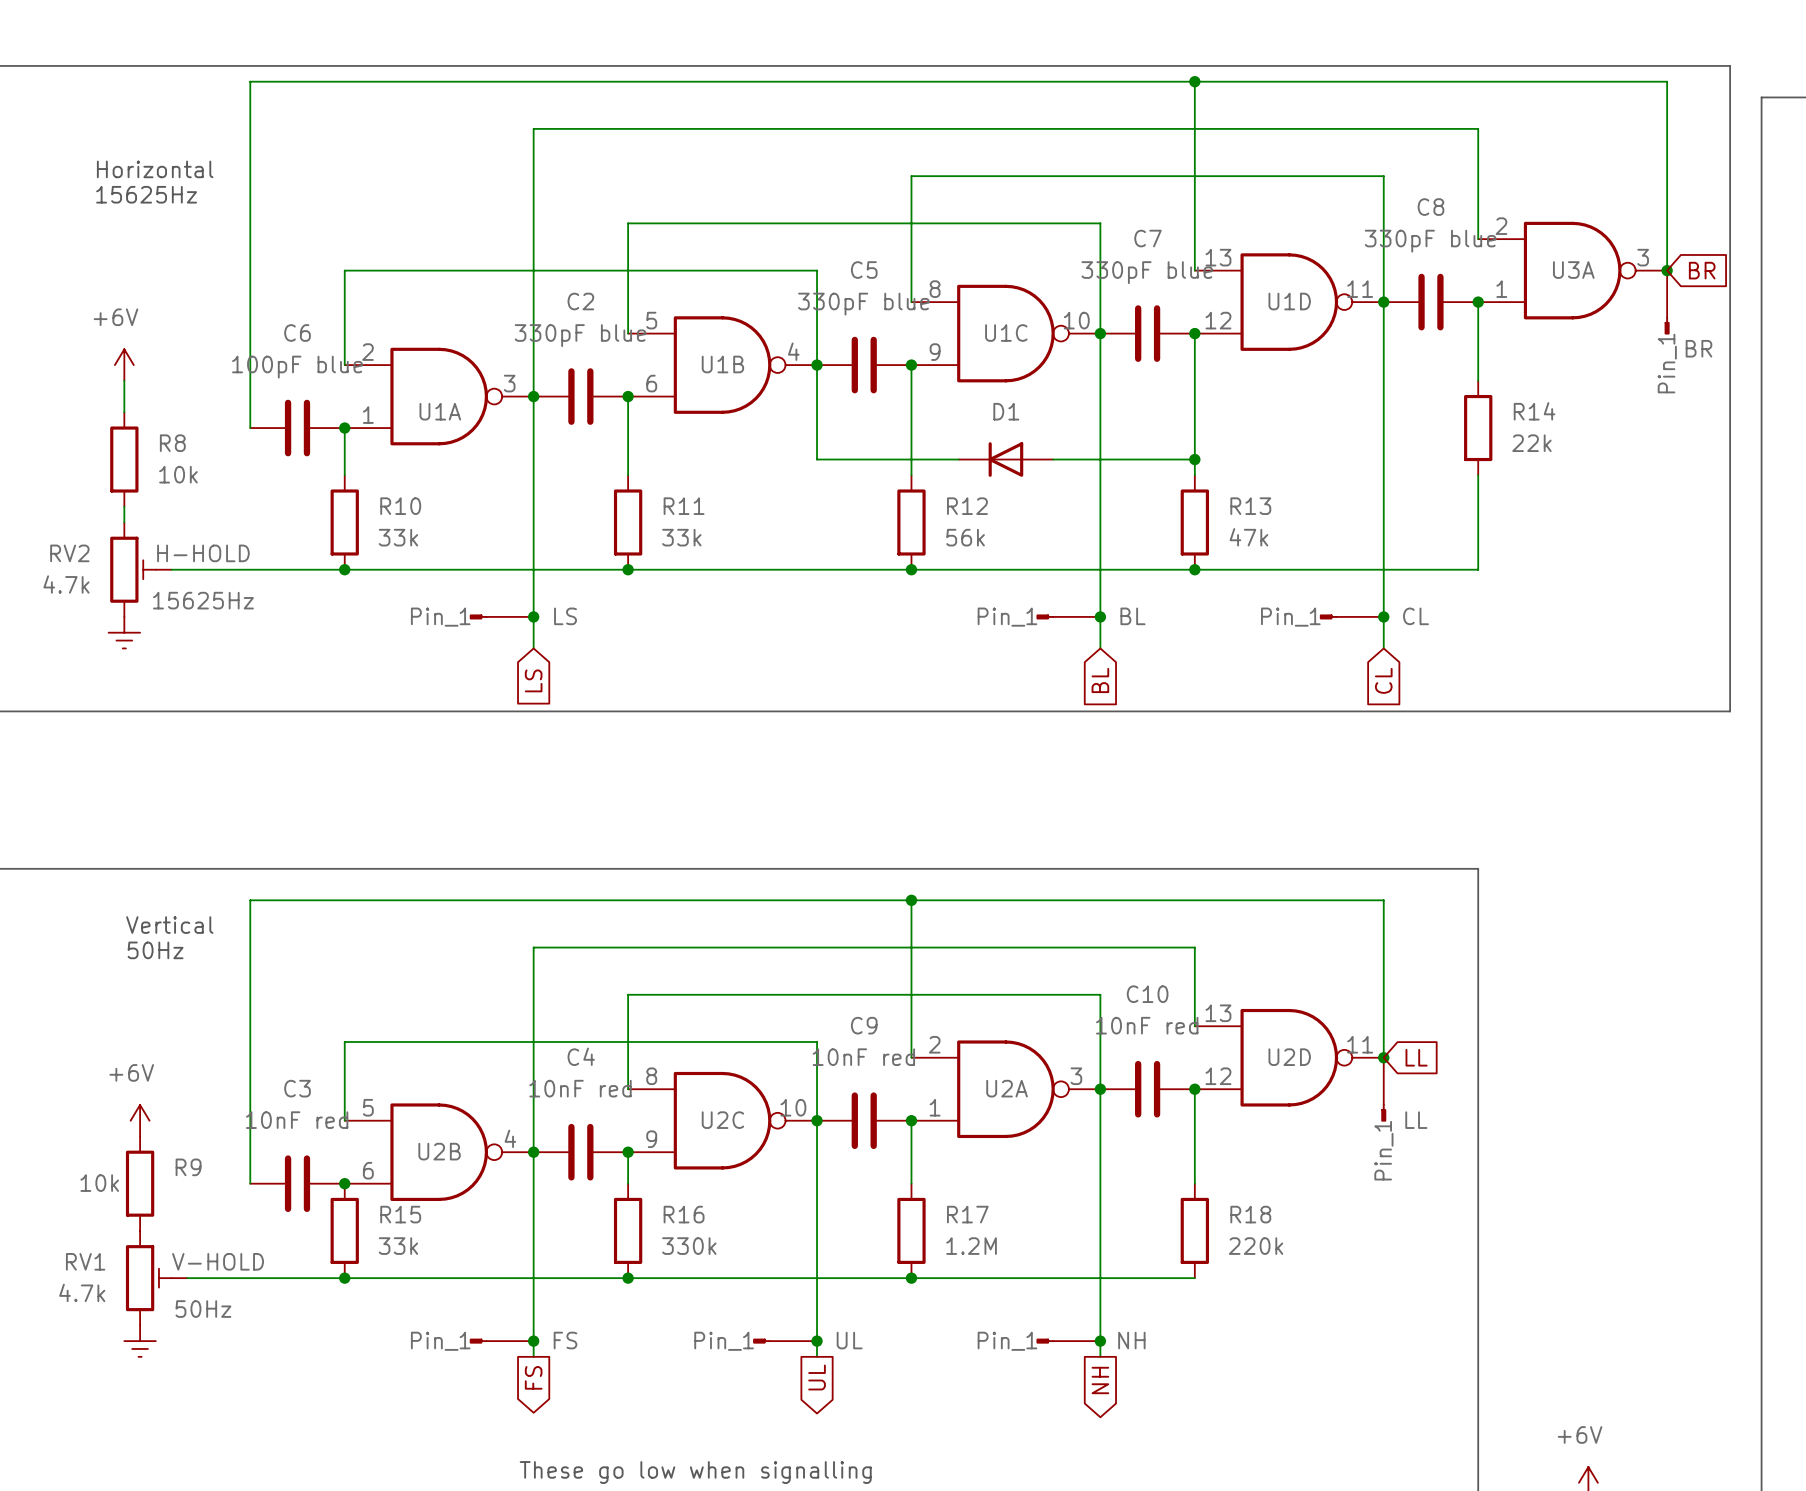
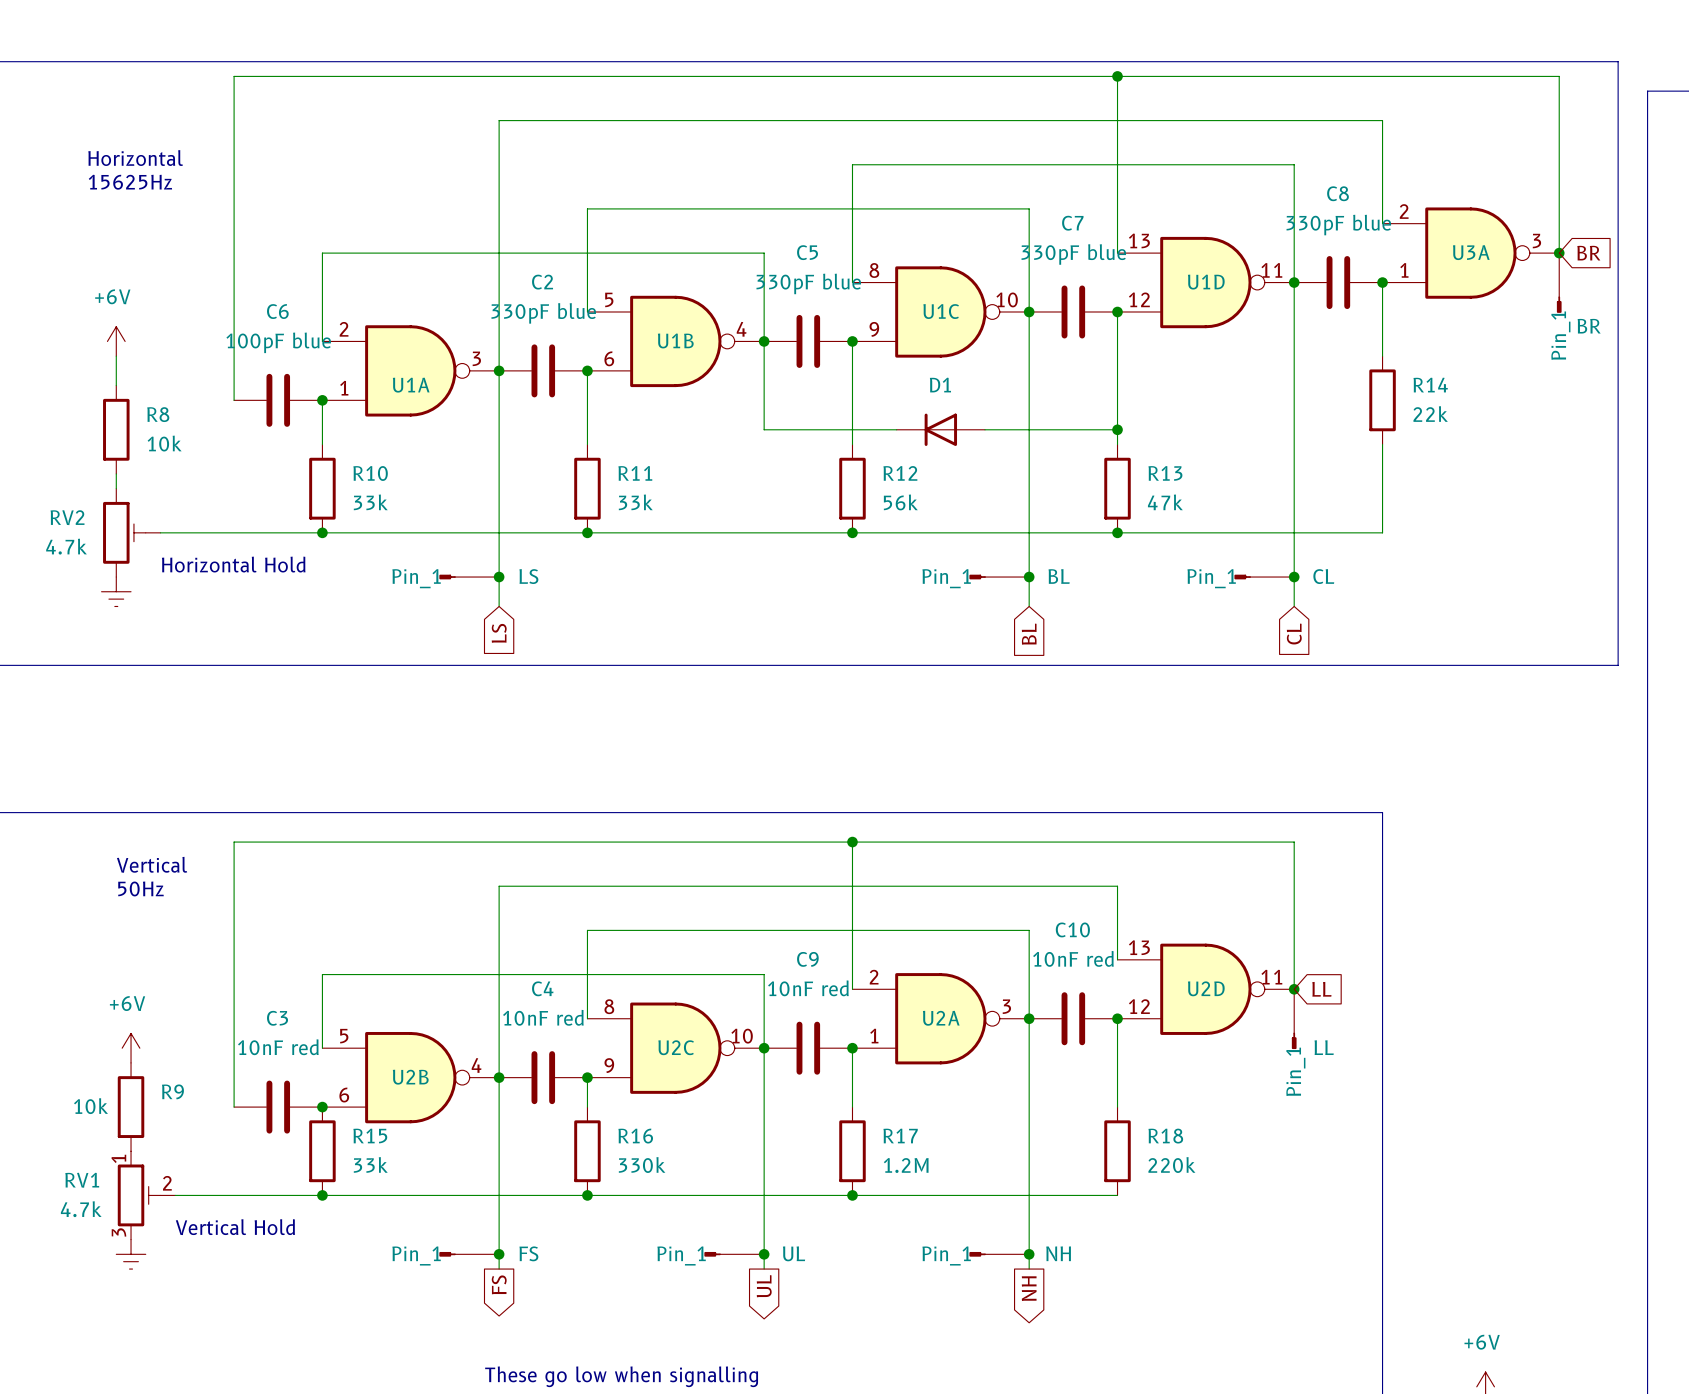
RV2 text: H-HOLD (203, 553) -> none
RV2 text: 15625Hz (203, 600) -> none
text: none -> Horizontal Hold (233, 564)
RV1 pin number: none -> 1 (118, 1158)
RV1 text: V-HOLD (218, 1261) -> none
RV1 pin number: none -> 2 (167, 1183)
RV1 text: 50Hz (203, 1309) -> none
text: none -> Vertical Hold (235, 1227)
RV1 pin number: none -> 3 (118, 1232)

